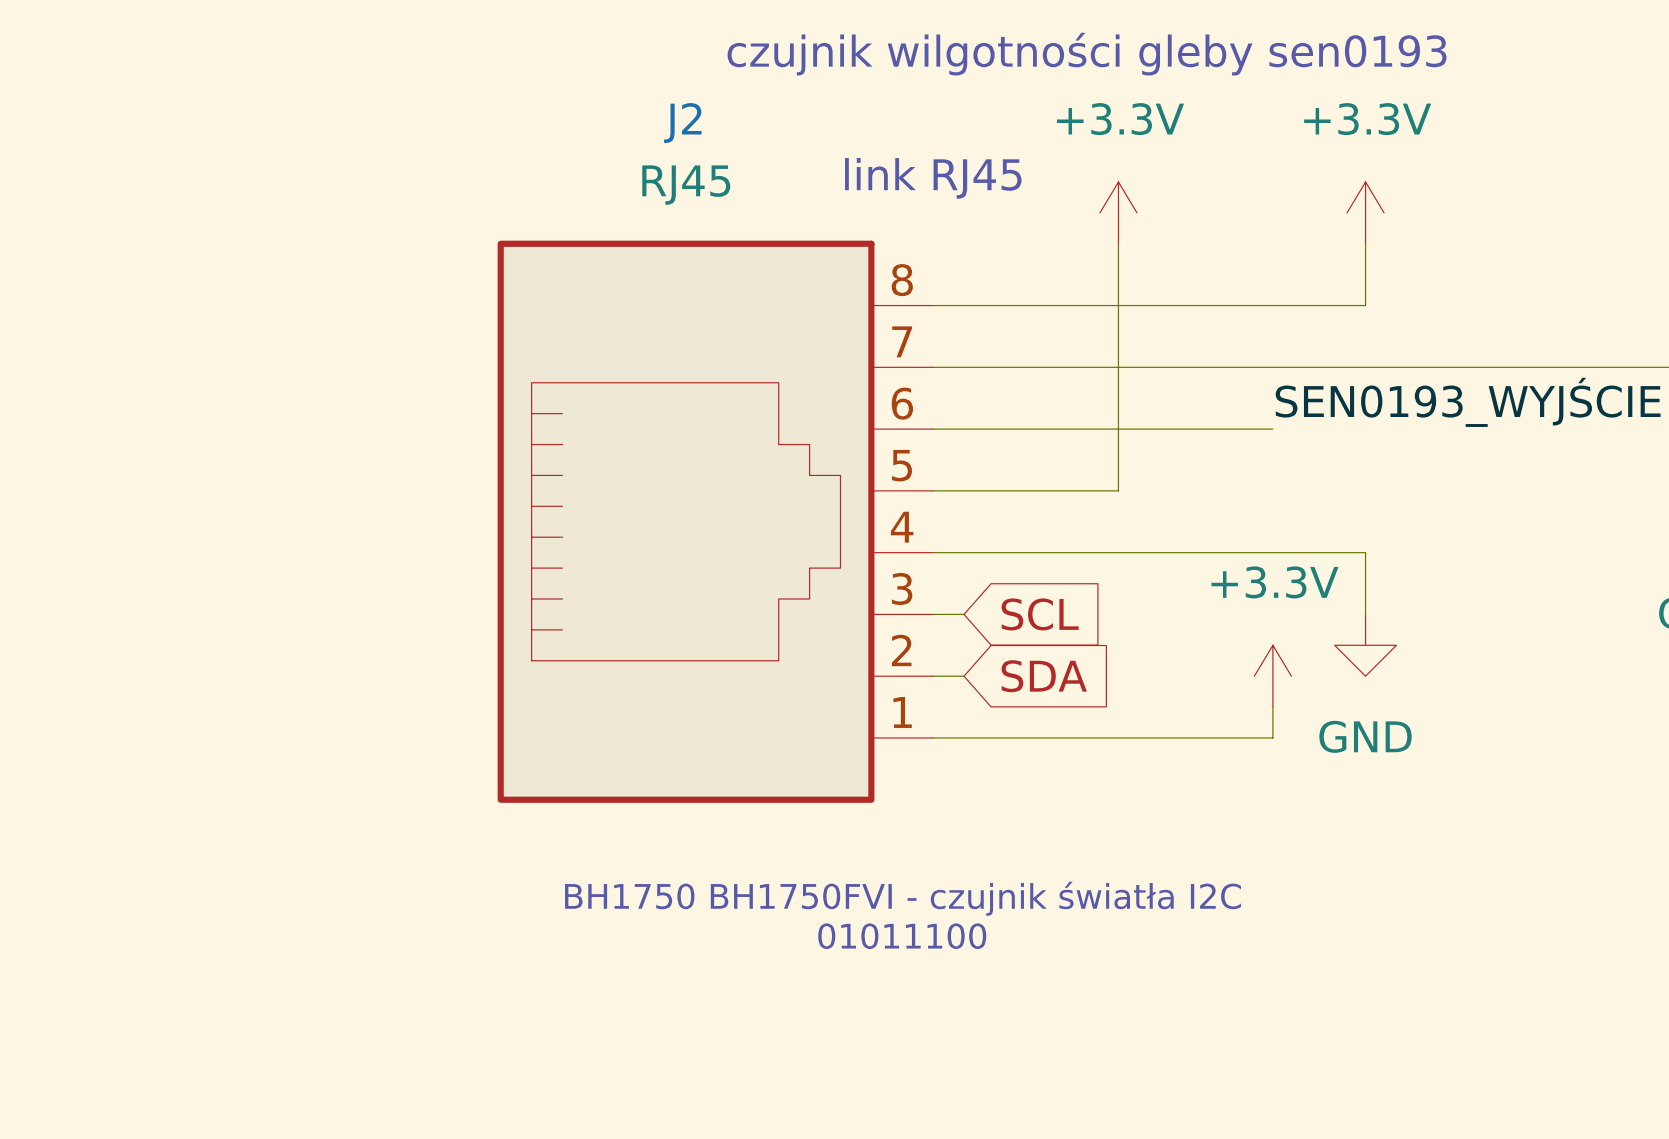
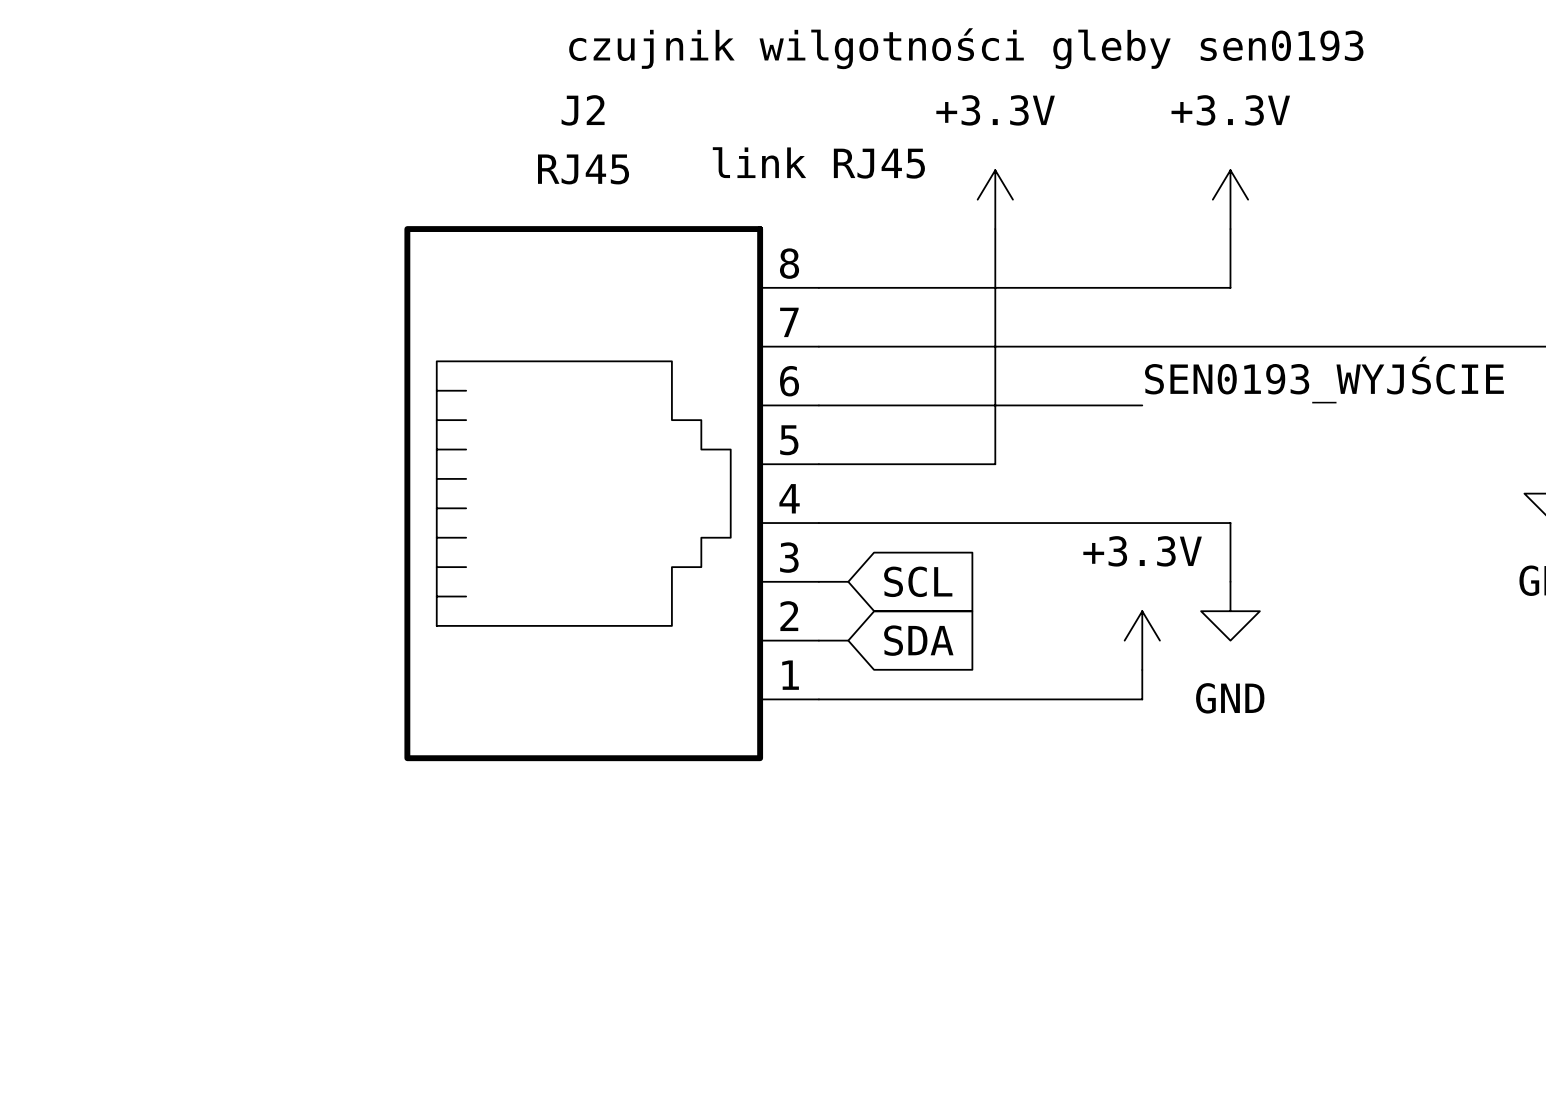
text: BH1750 BH1750FVI - czujnik światła I2C (903, 898) -> none
text: 01011100 (902, 936) -> none

